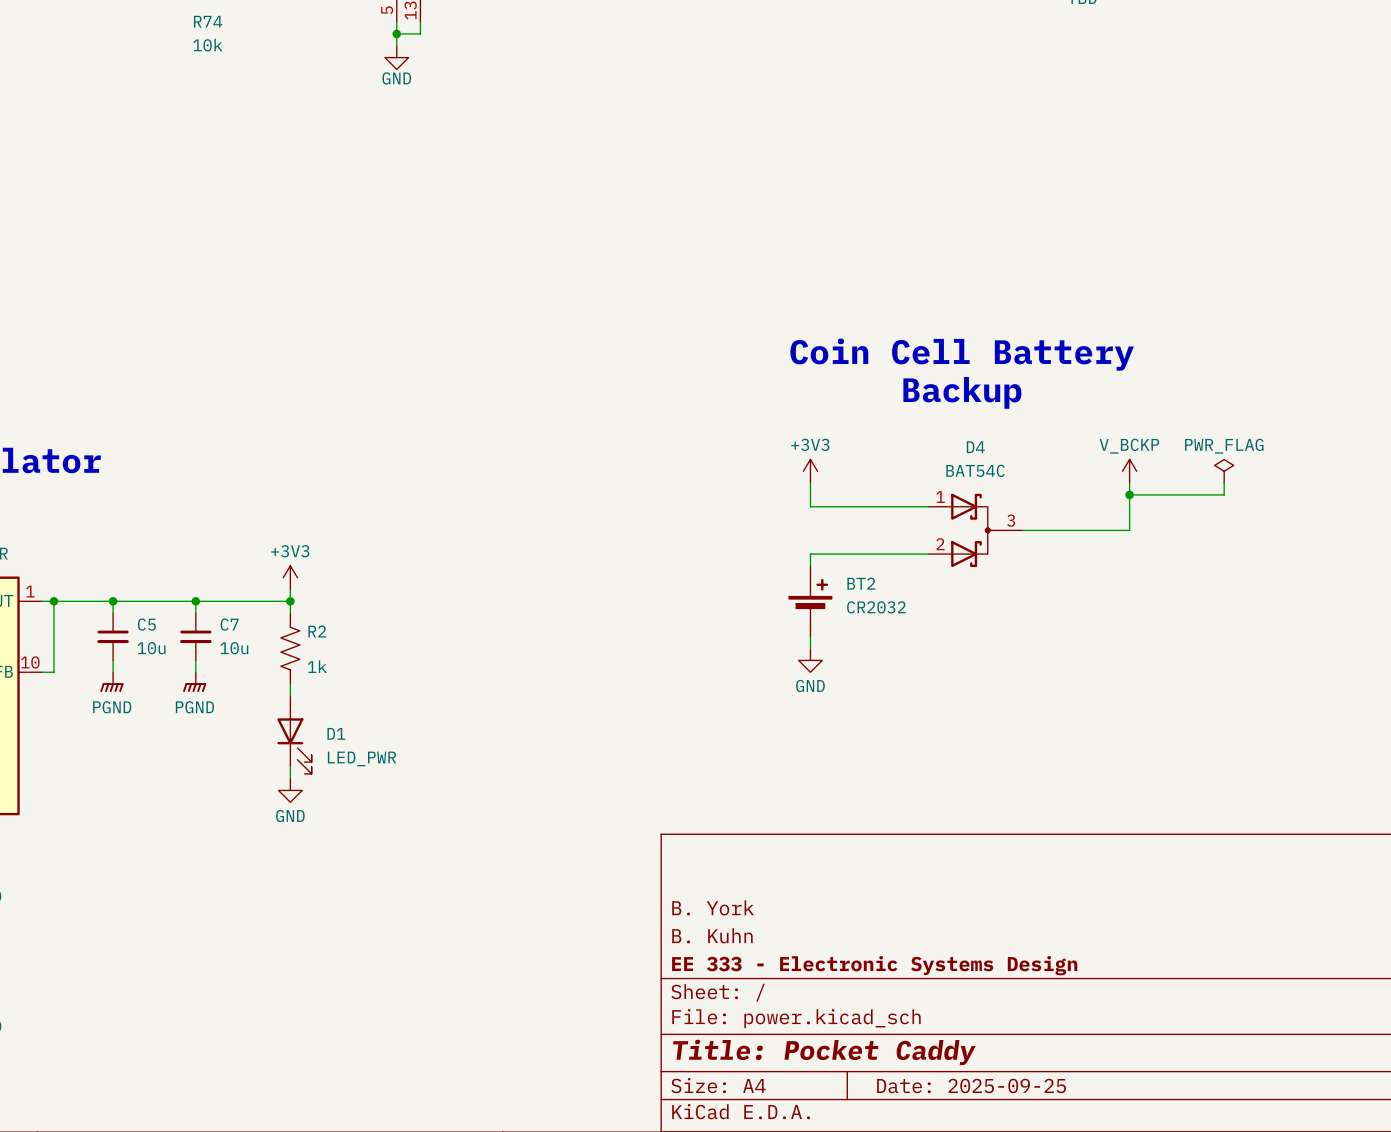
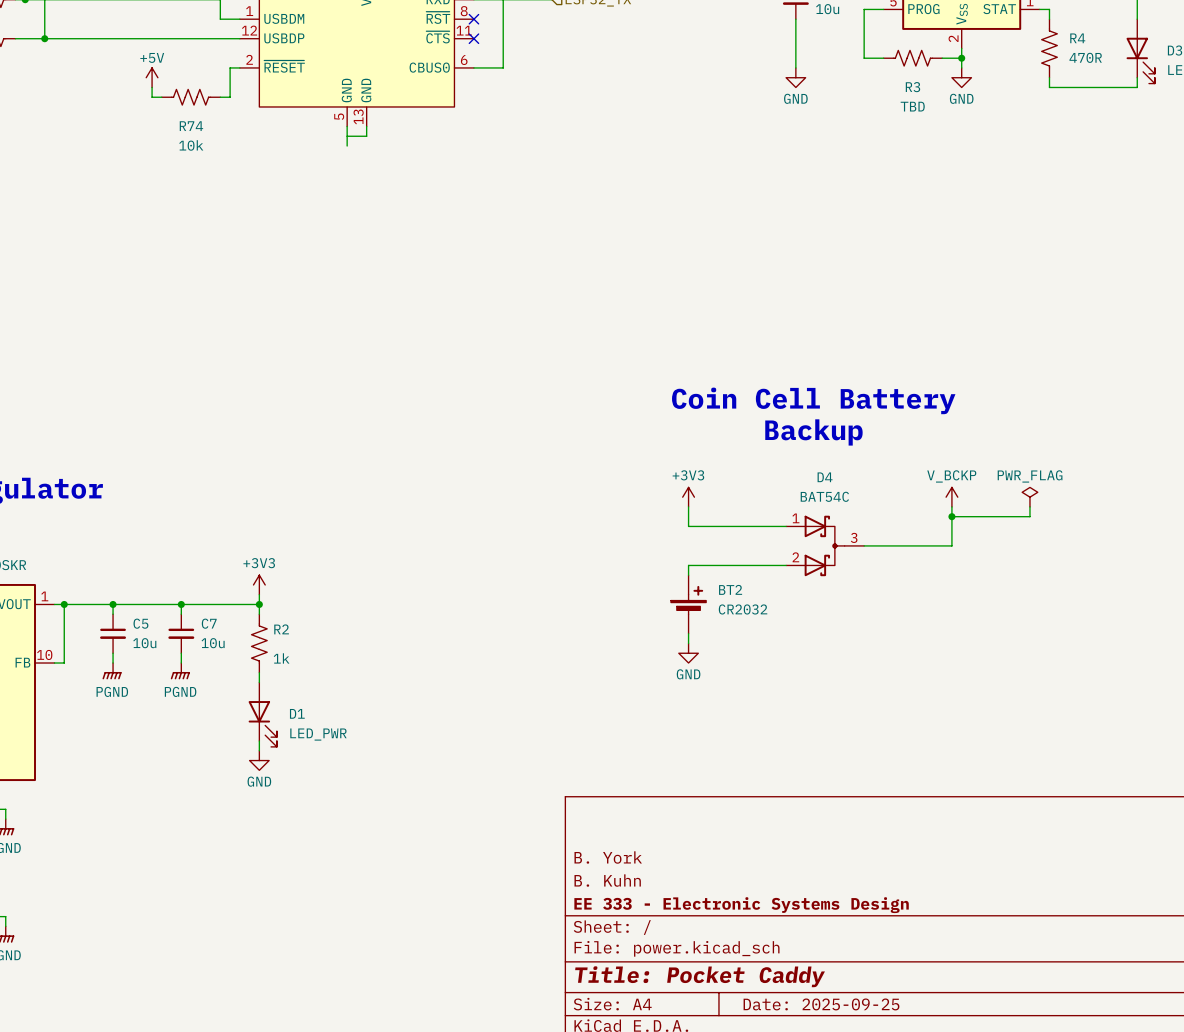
junction: (396, 33) -> none
power symbol: GND (396, 57) -> none

